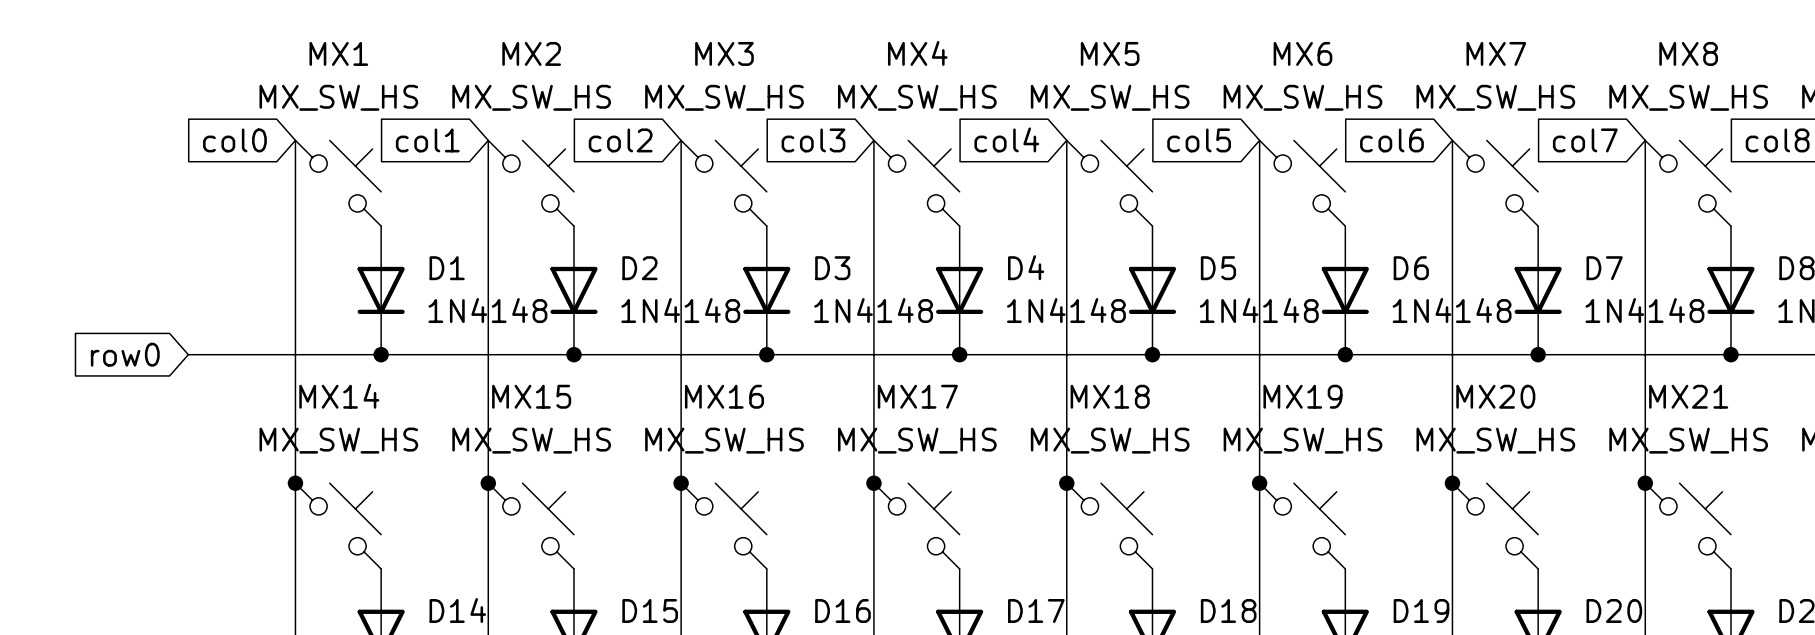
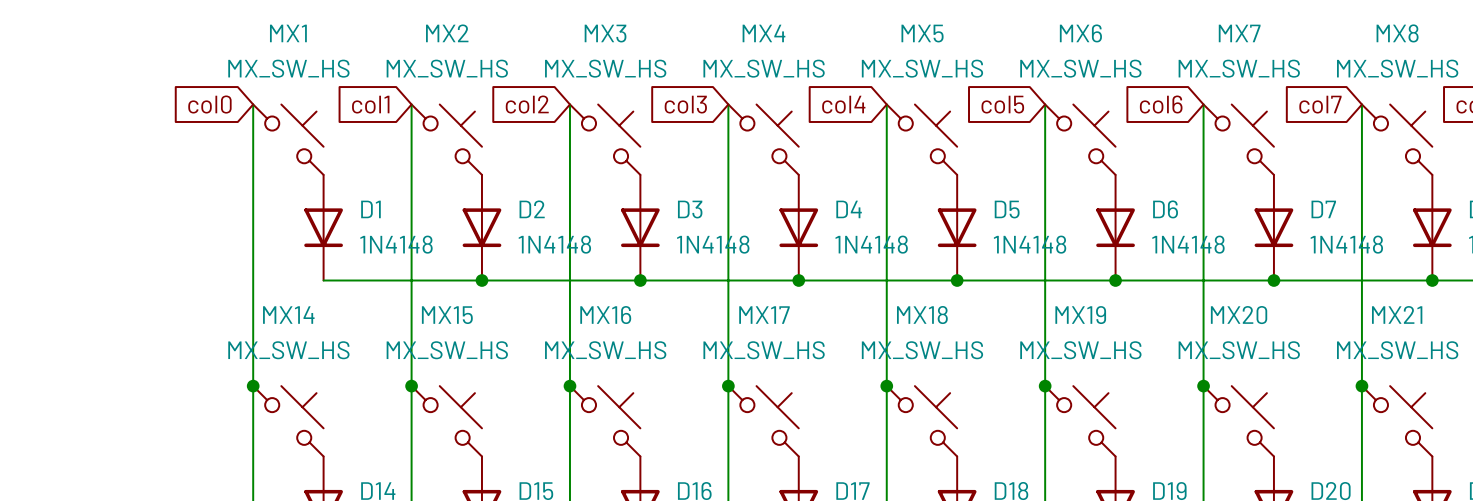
global label: row0 (125, 354) -> none
wire: (188, 354) (381, 354) -> none
junction: (381, 354) -> none

